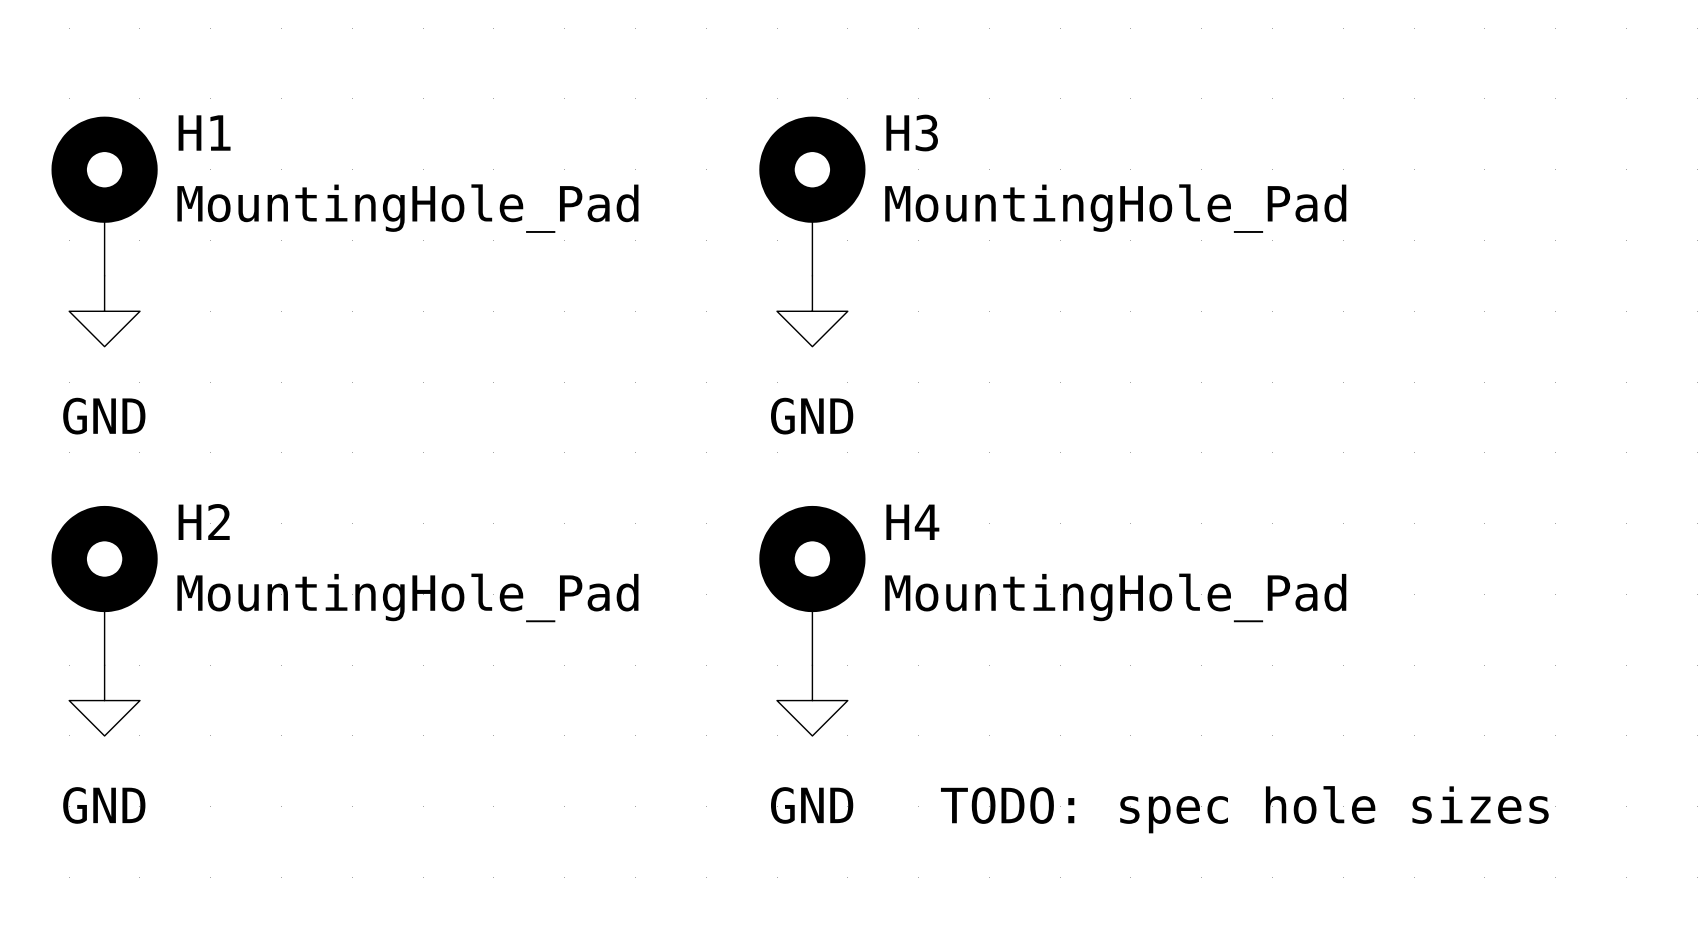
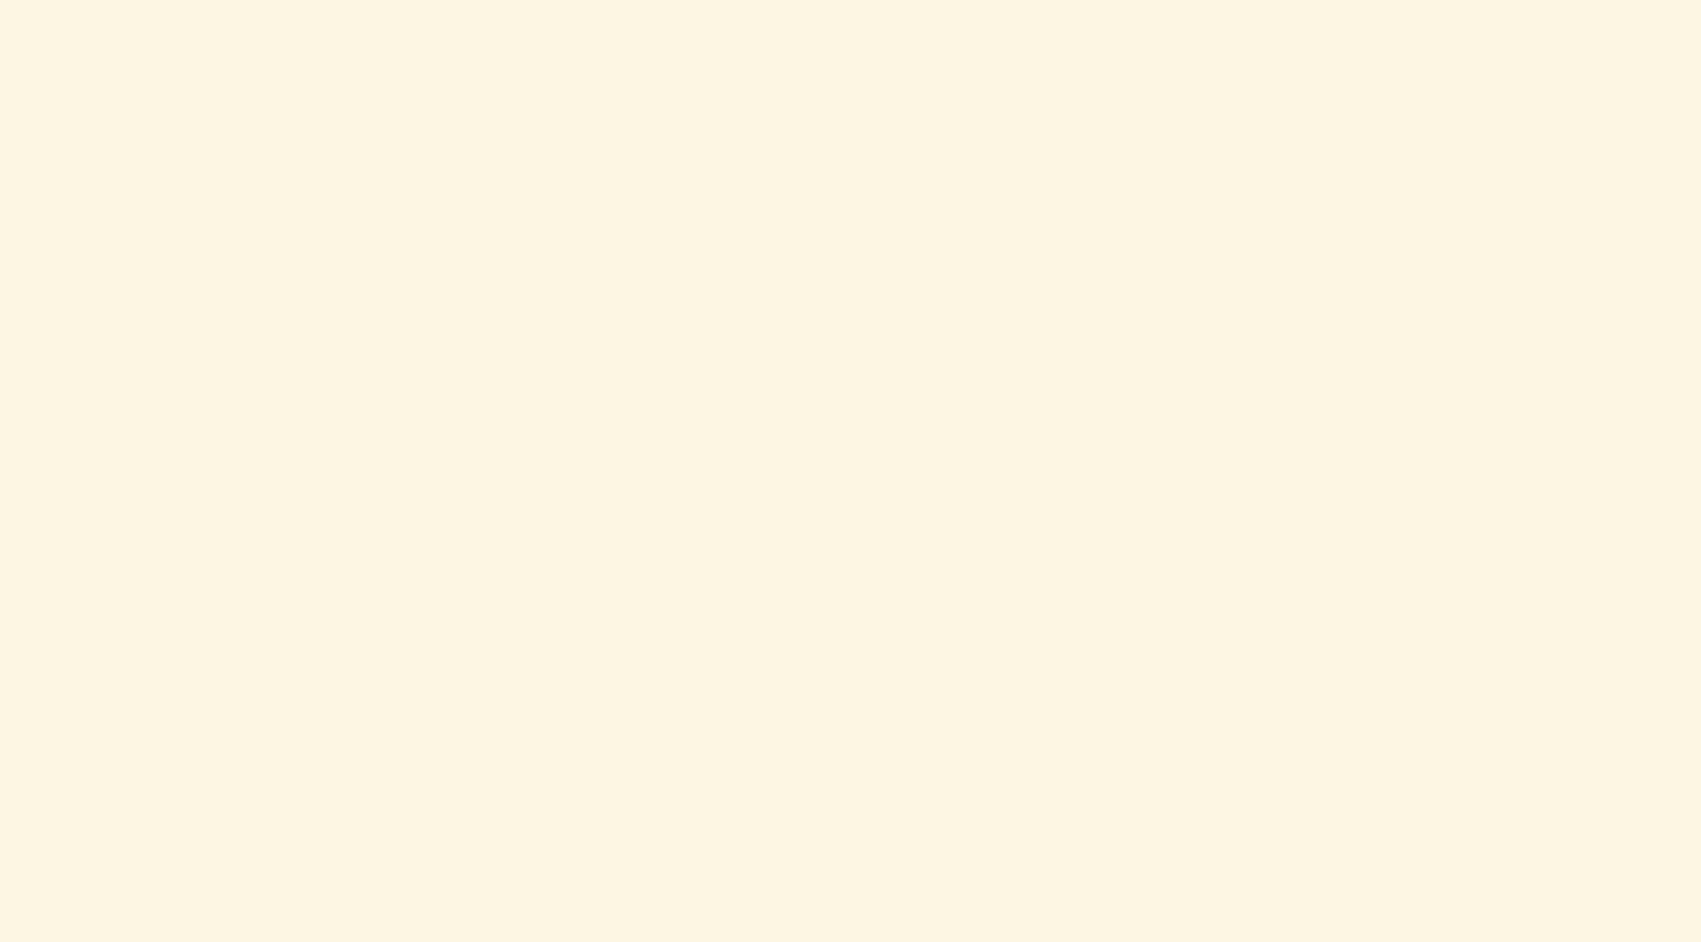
H1: MountingHole_Pad (104, 196) -> none
H3: MountingHole_Pad (812, 196) -> none
power symbol: GND (104, 311) -> none
power symbol: GND (812, 311) -> none
H2: MountingHole_Pad (104, 585) -> none
H4: MountingHole_Pad (812, 585) -> none
power symbol: GND (104, 700) -> none
power symbol: GND (812, 700) -> none
text: TODO: spec hole sizes (1244, 809) -> none

